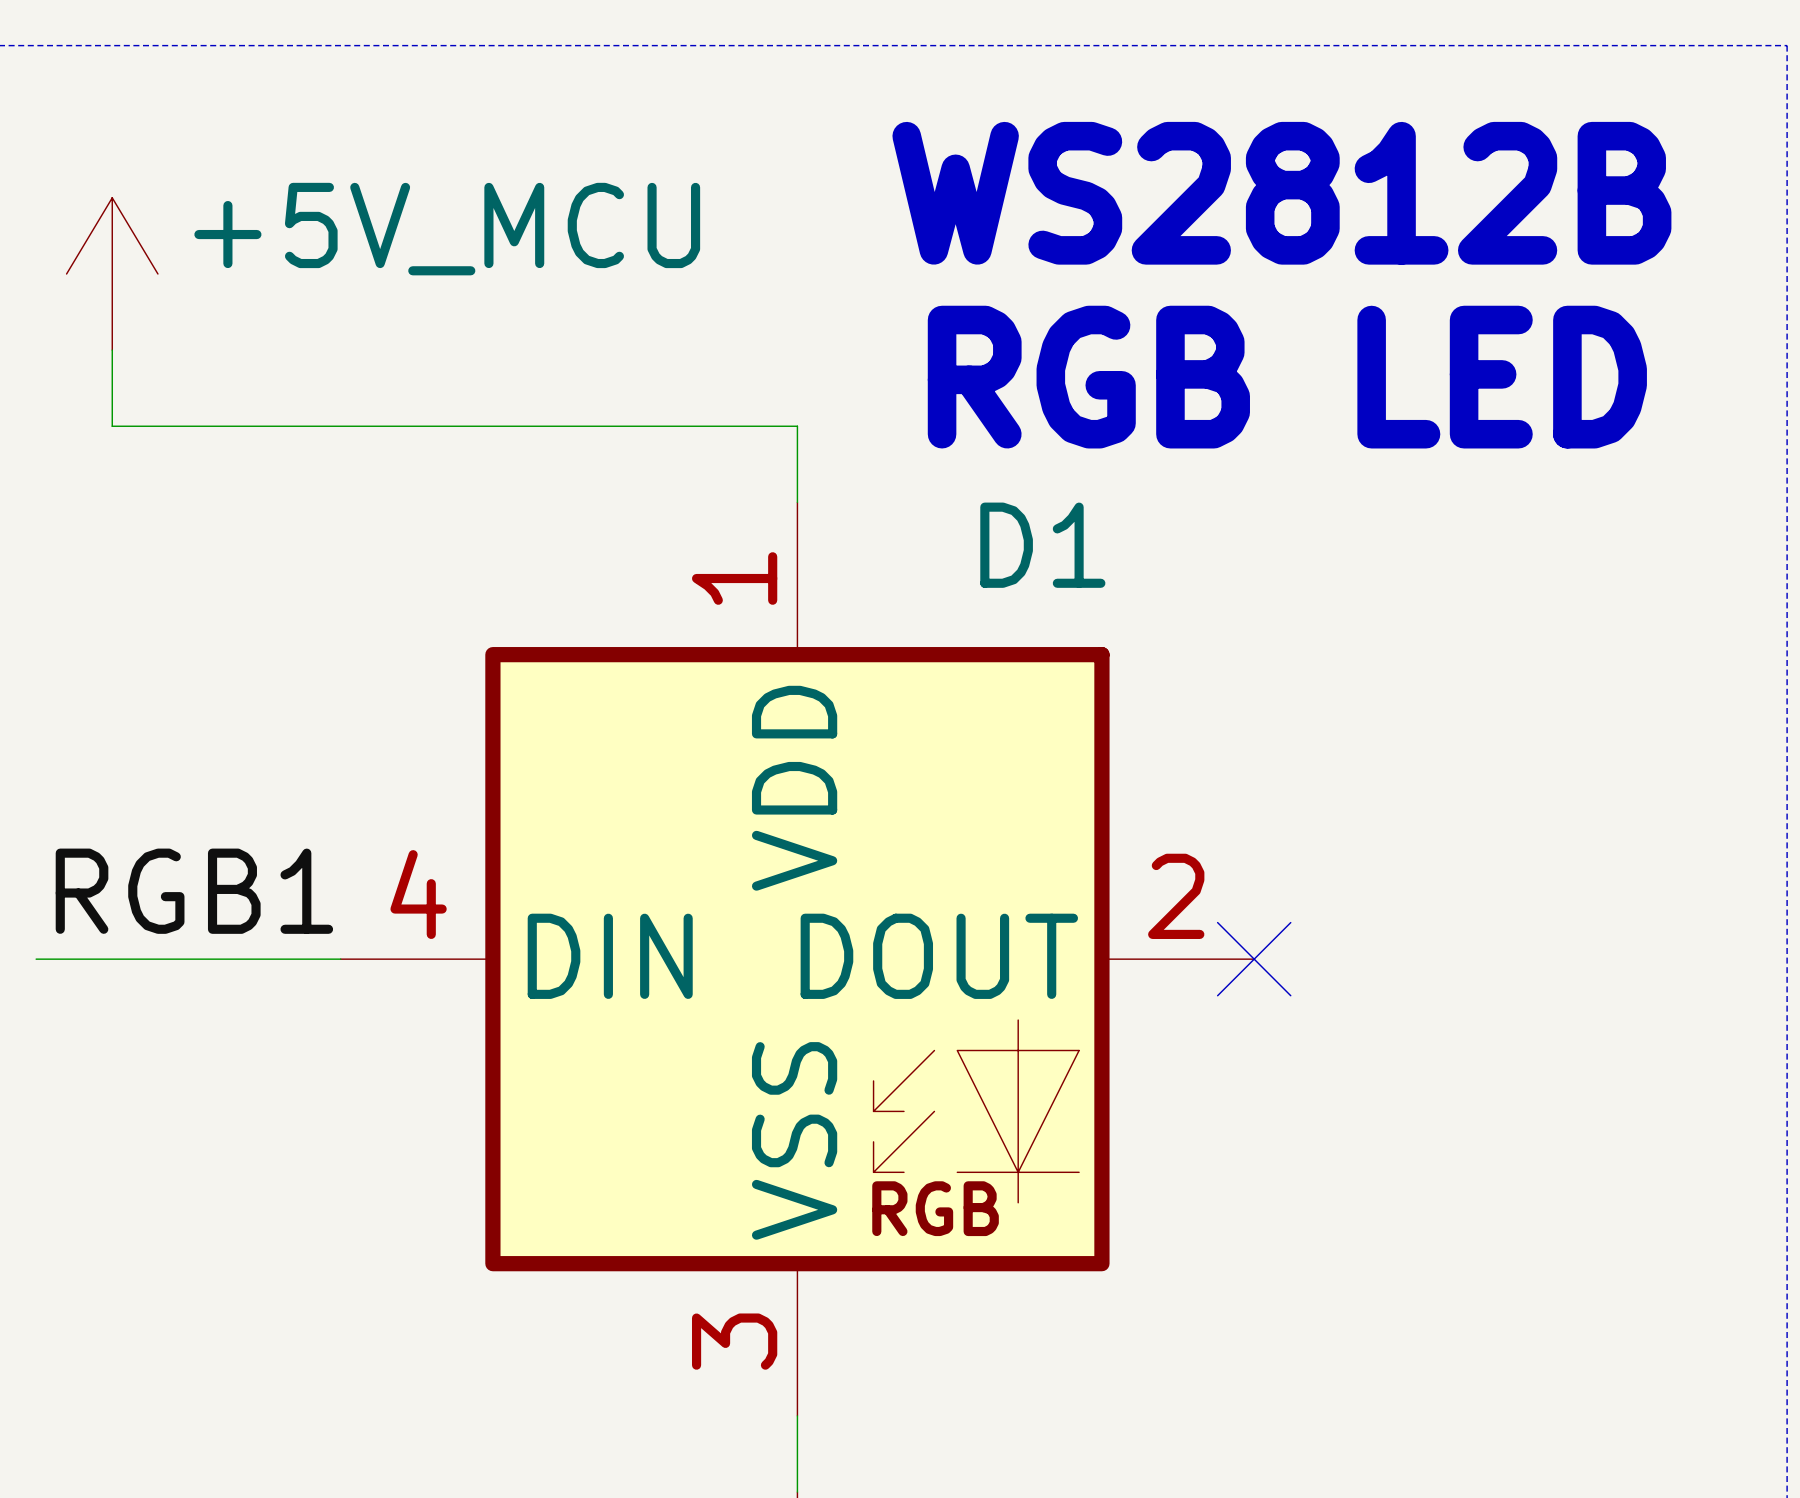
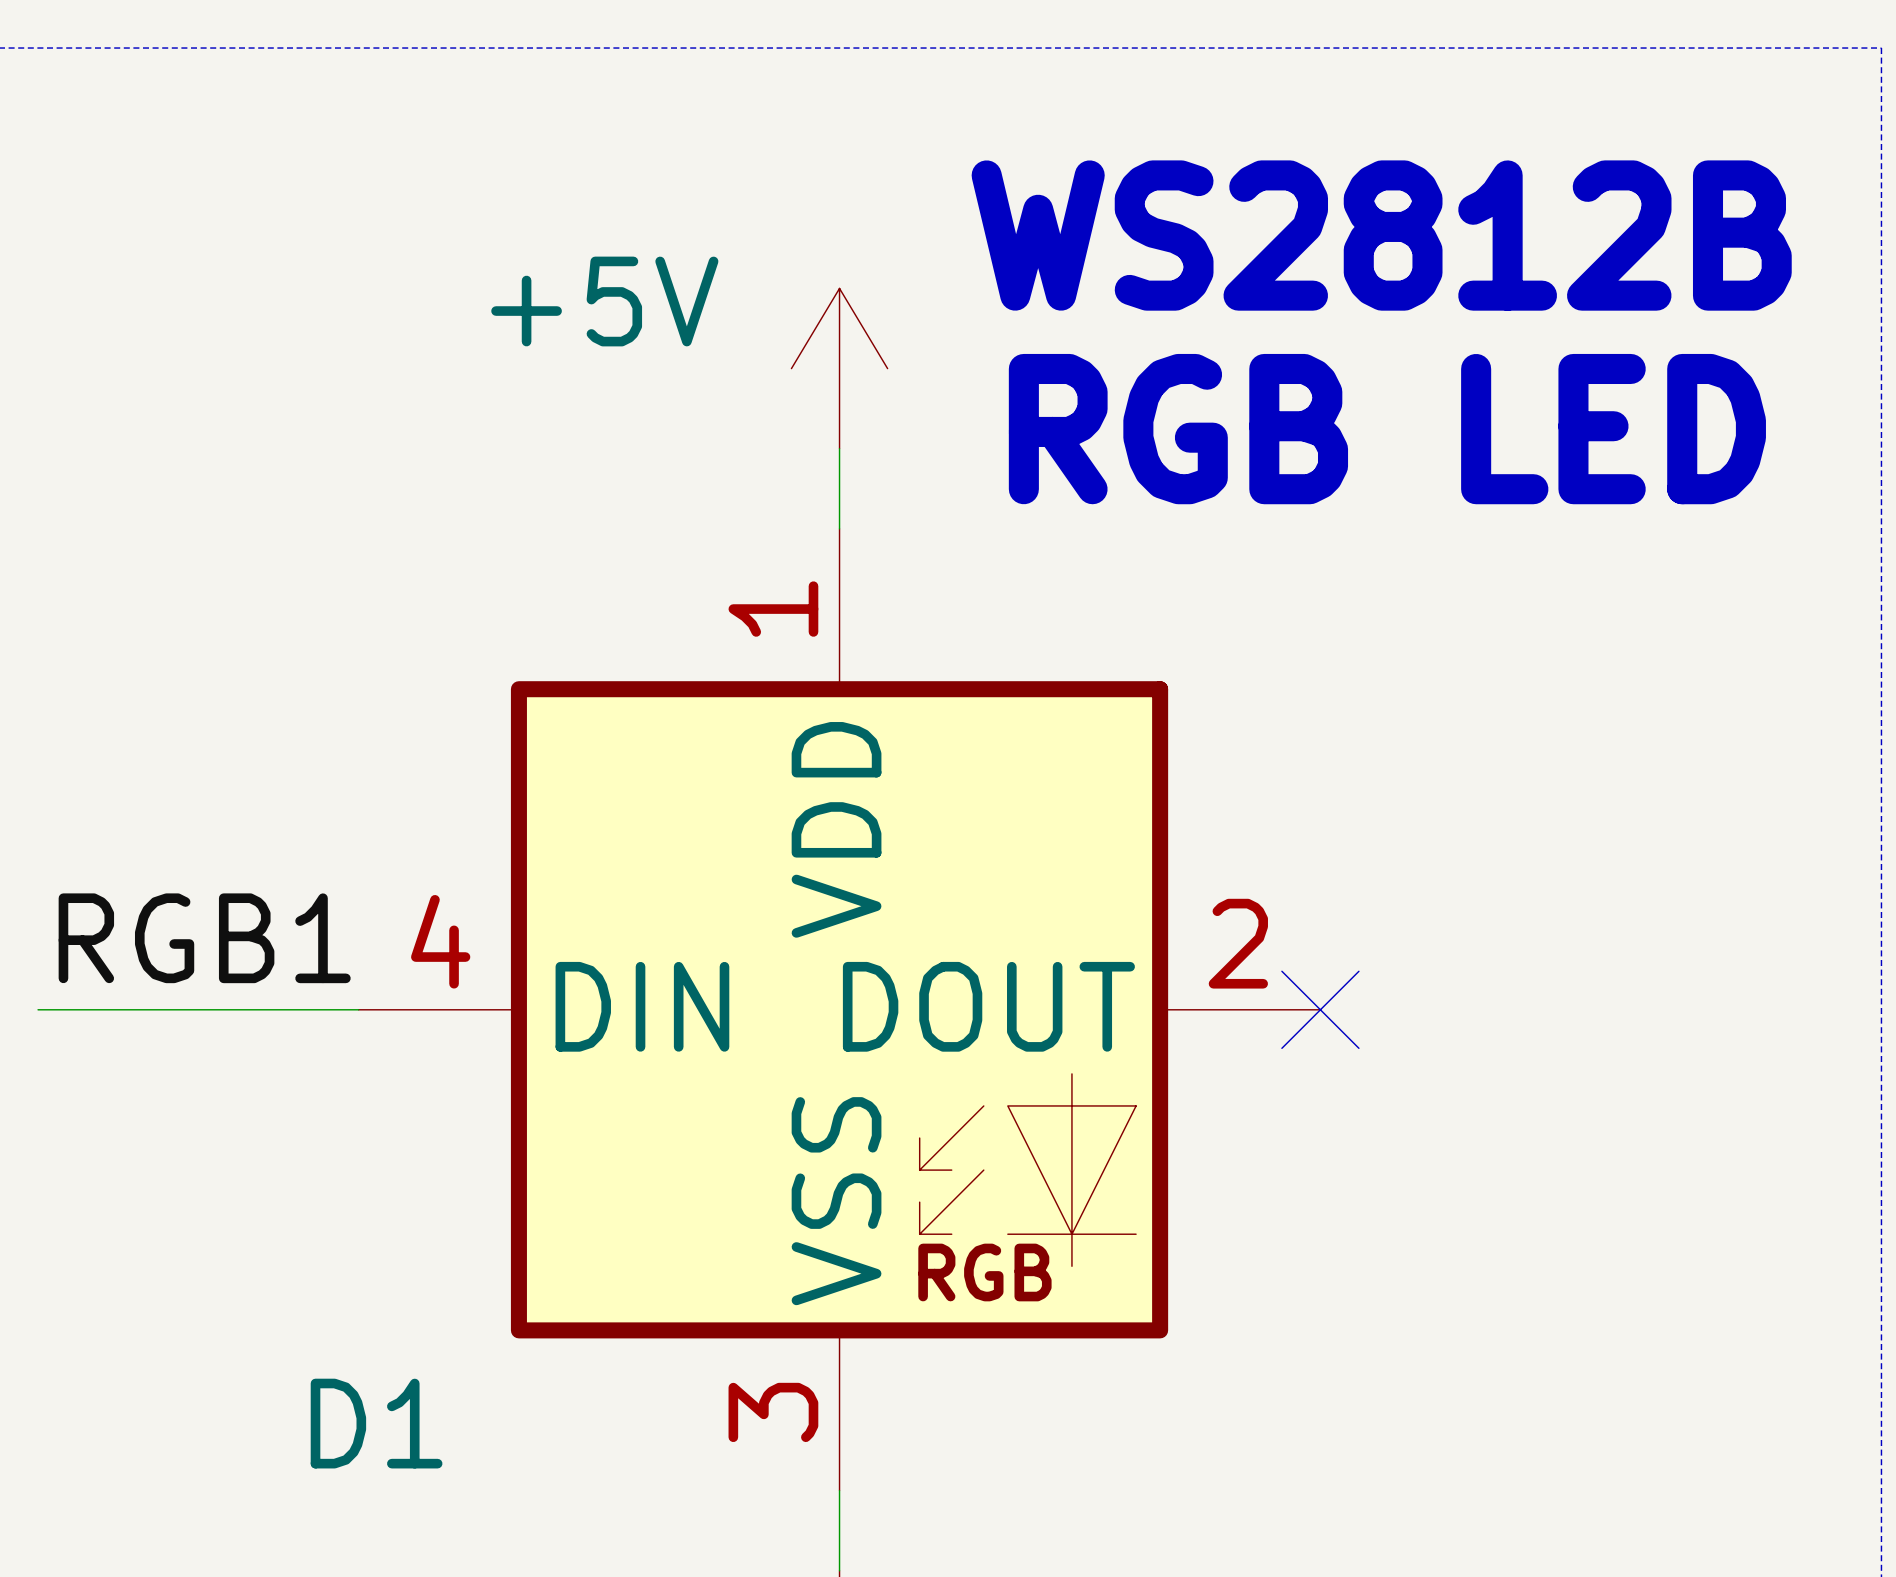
text position: WS2812B (1281, 193) -> WS2812B (1381, 235)
power symbol: +5V_MCU (112, 273) -> none
wire: (112, 350) (112, 426) (797, 426) -> none
power symbol: none -> +5V (839, 368)
text position: RGB LED (1287, 377) -> RGB LED (1387, 429)
D1 name position: D1 (1042, 545) -> D1 (376, 1423)

